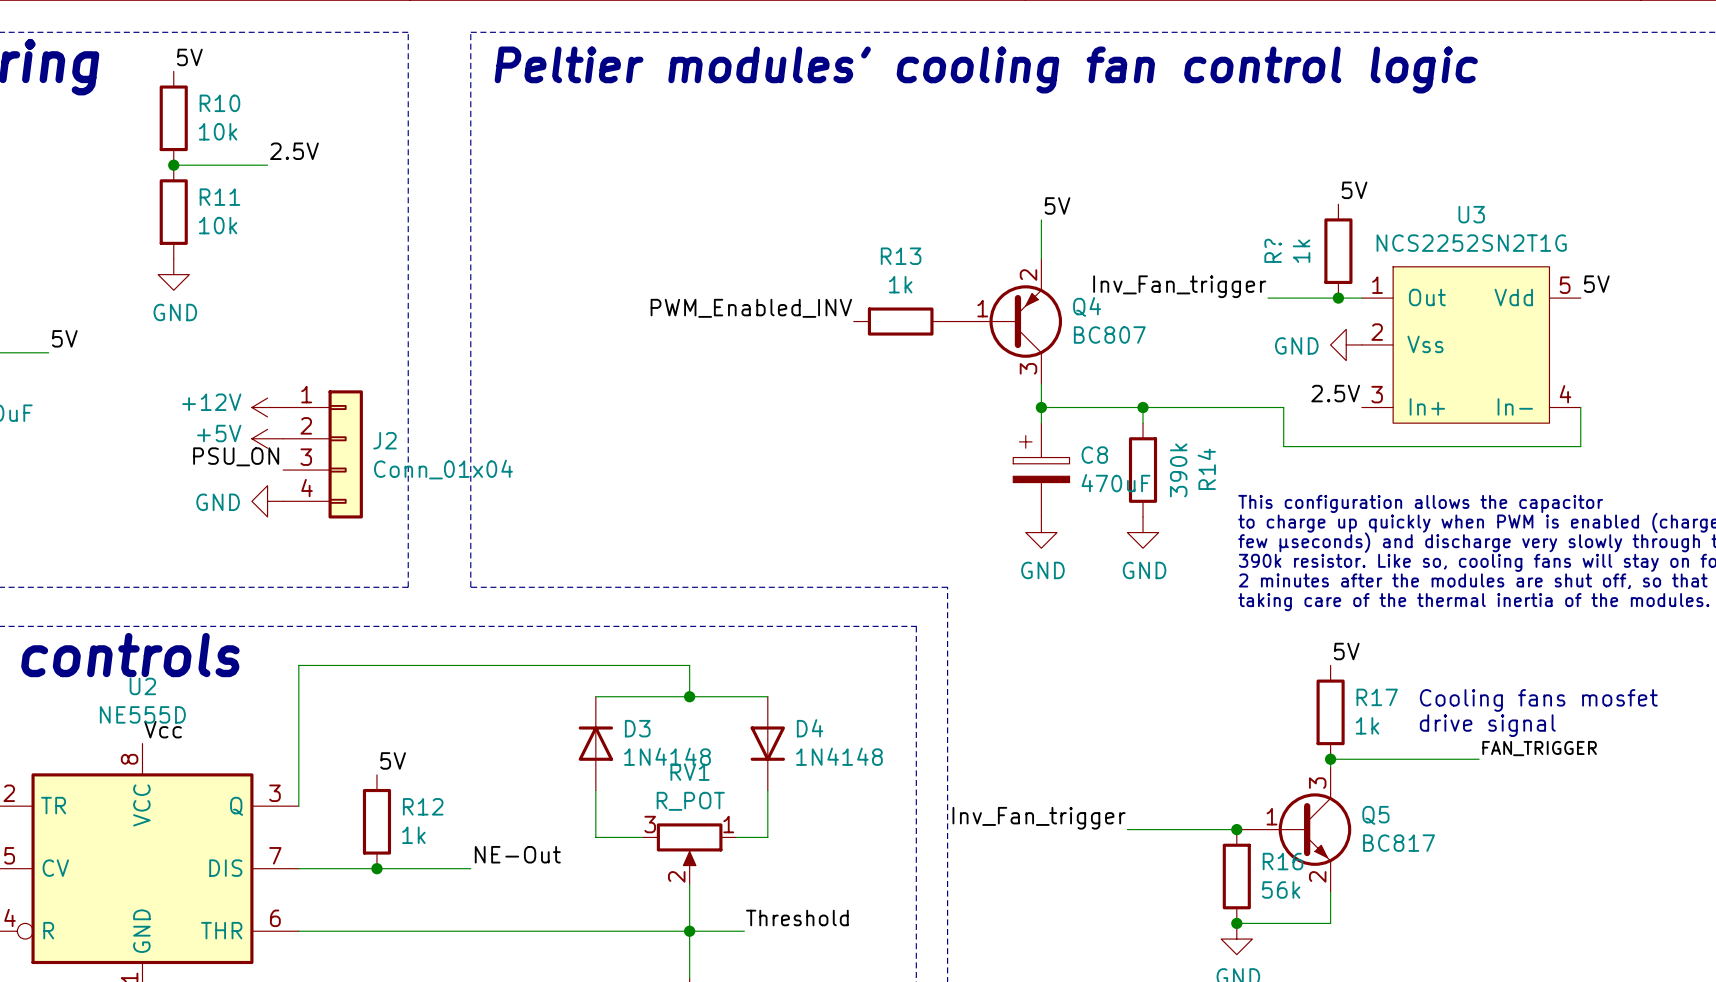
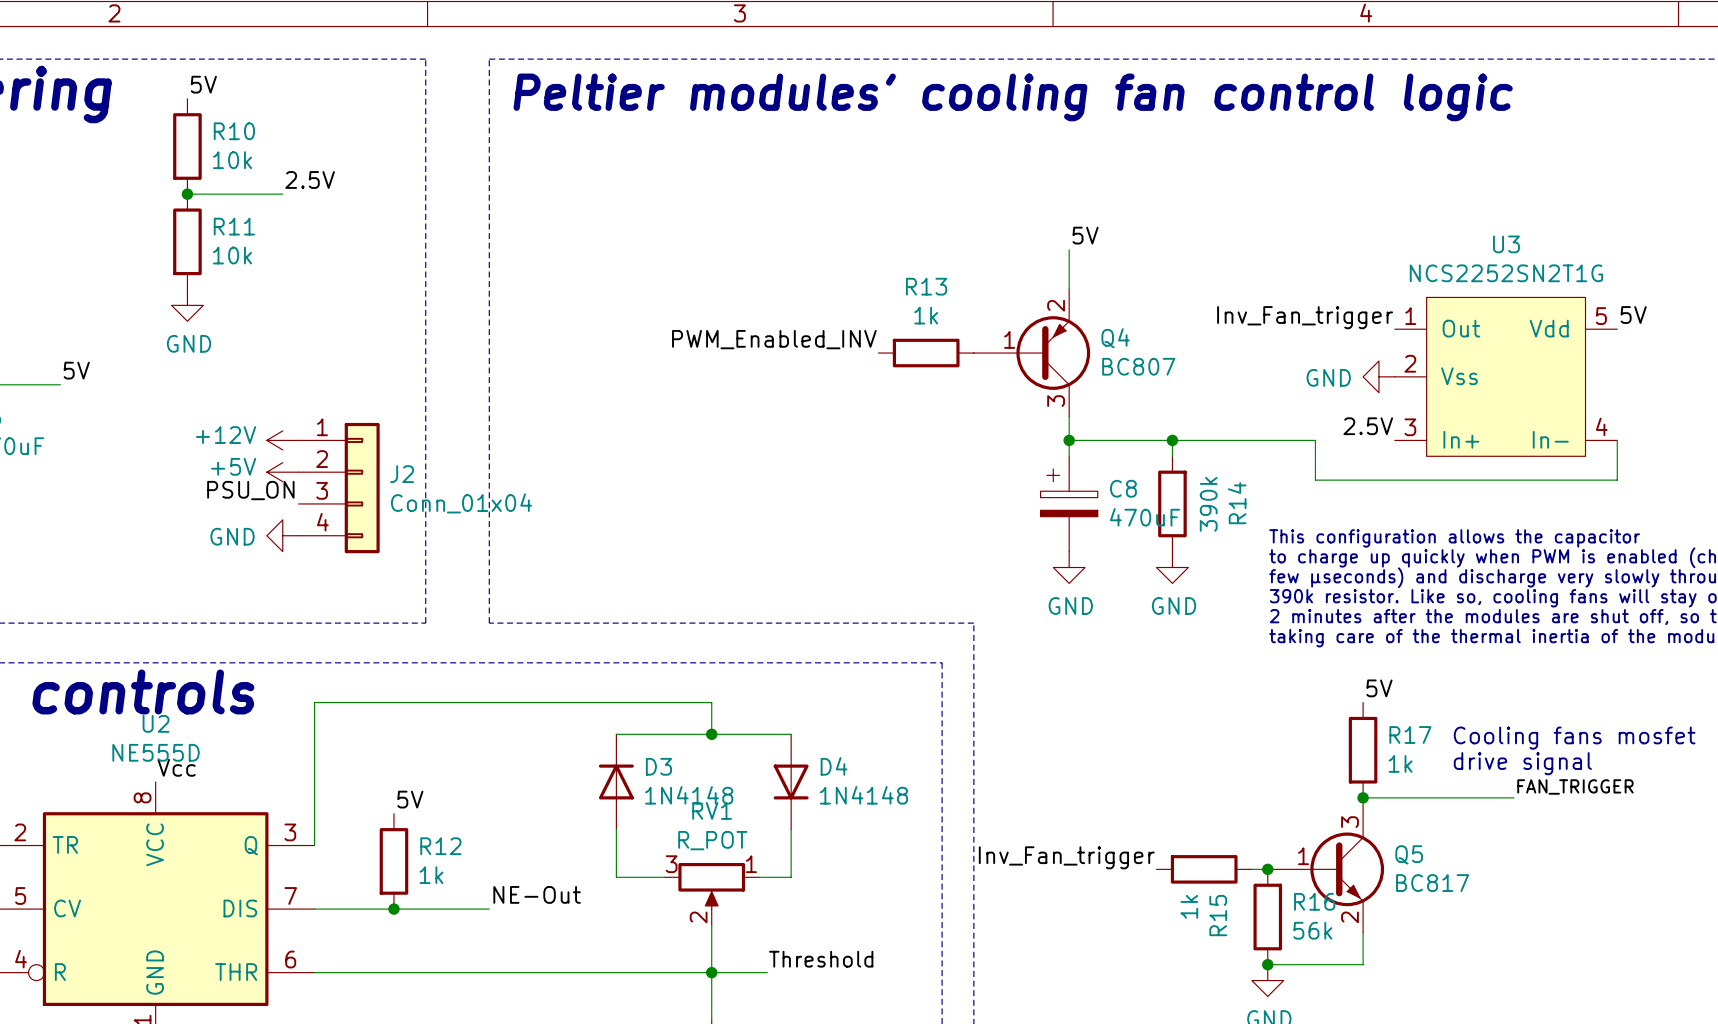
label: 5V (1354, 190) -> none
R?: 1k (1338, 251) -> none
label position: Inv_Fan_trigger (1179, 286) -> Inv_Fan_trigger (1305, 317)
wire: (1268, 298) (1361, 298) -> none
junction: (1338, 298) -> none
wire: (1127, 829) (1221, 829) -> none
R15: none -> 1k (1204, 869)

